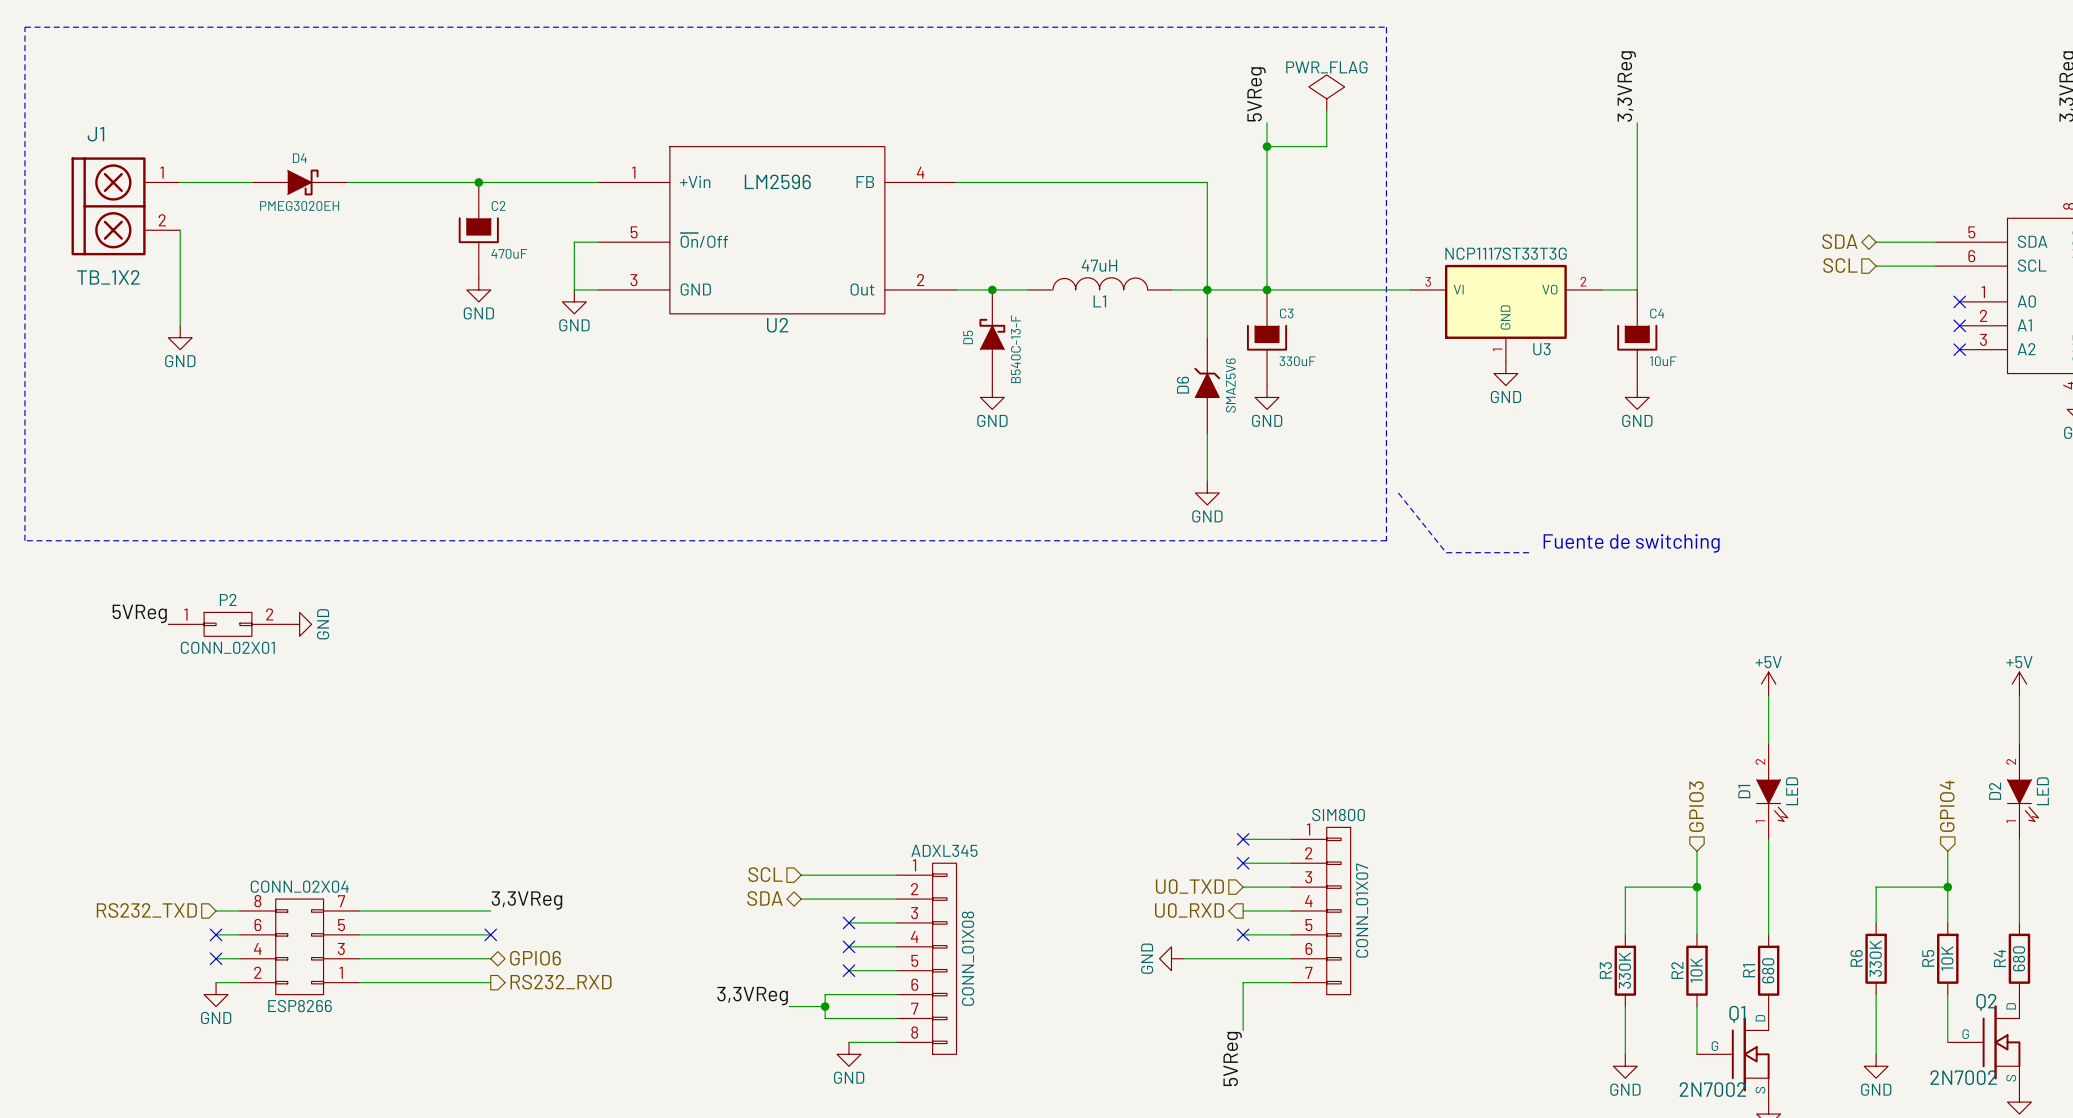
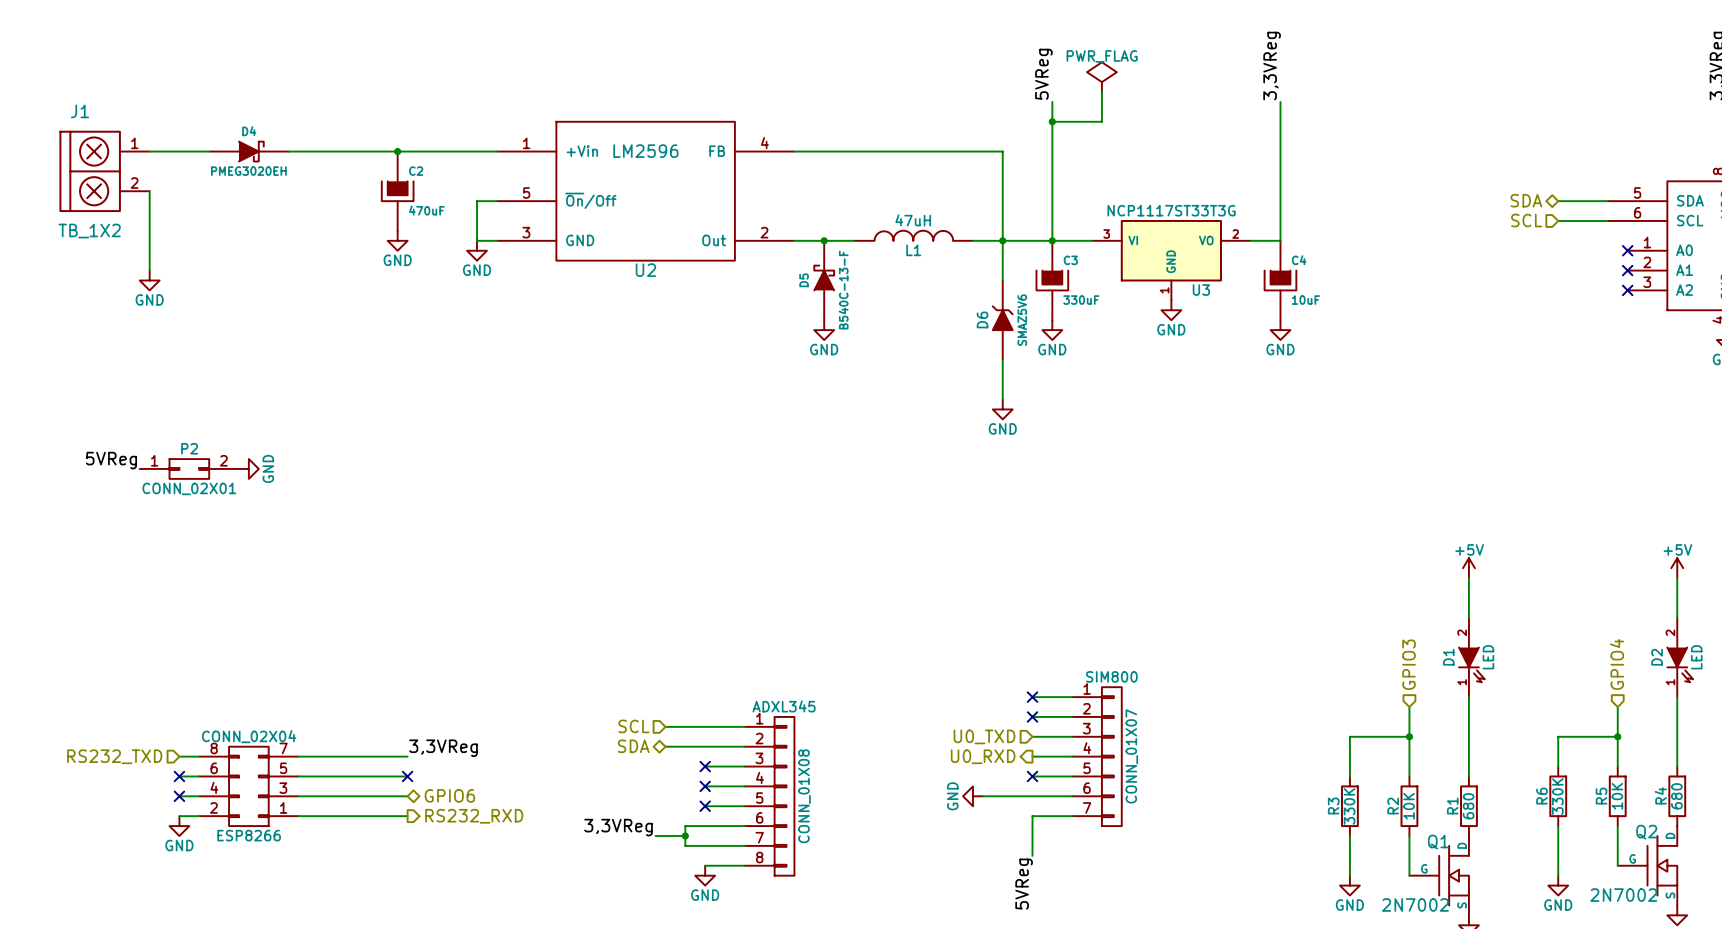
line: (24, 27) (24, 540) (1386, 540) (1386, 27) (24, 27) -> none
label position: 3,3VReg (1626, 86) -> 3,3VReg (1272, 66)
wire: (1637, 122) (1637, 289) (1601, 289) -> (1280, 101) (1280, 240) (1250, 240)
U3 position: (1505, 313) -> (1171, 260)
C4 position: (1637, 337) -> (1280, 280)
power symbol: none -> GND (1171, 310)
power symbol position: GND (1505, 373) -> GND (1280, 330)
power symbol: GND (1637, 397) -> none
line: (1398, 492) (1446, 552) (1529, 552) -> none
text: Fuente de switching (1631, 543) -> none
label position: 5VReg (139, 613) -> 5VReg (111, 460)
P2 position: (227, 624) -> (189, 468)
power symbol position: GND (299, 624) -> GND (248, 468)

